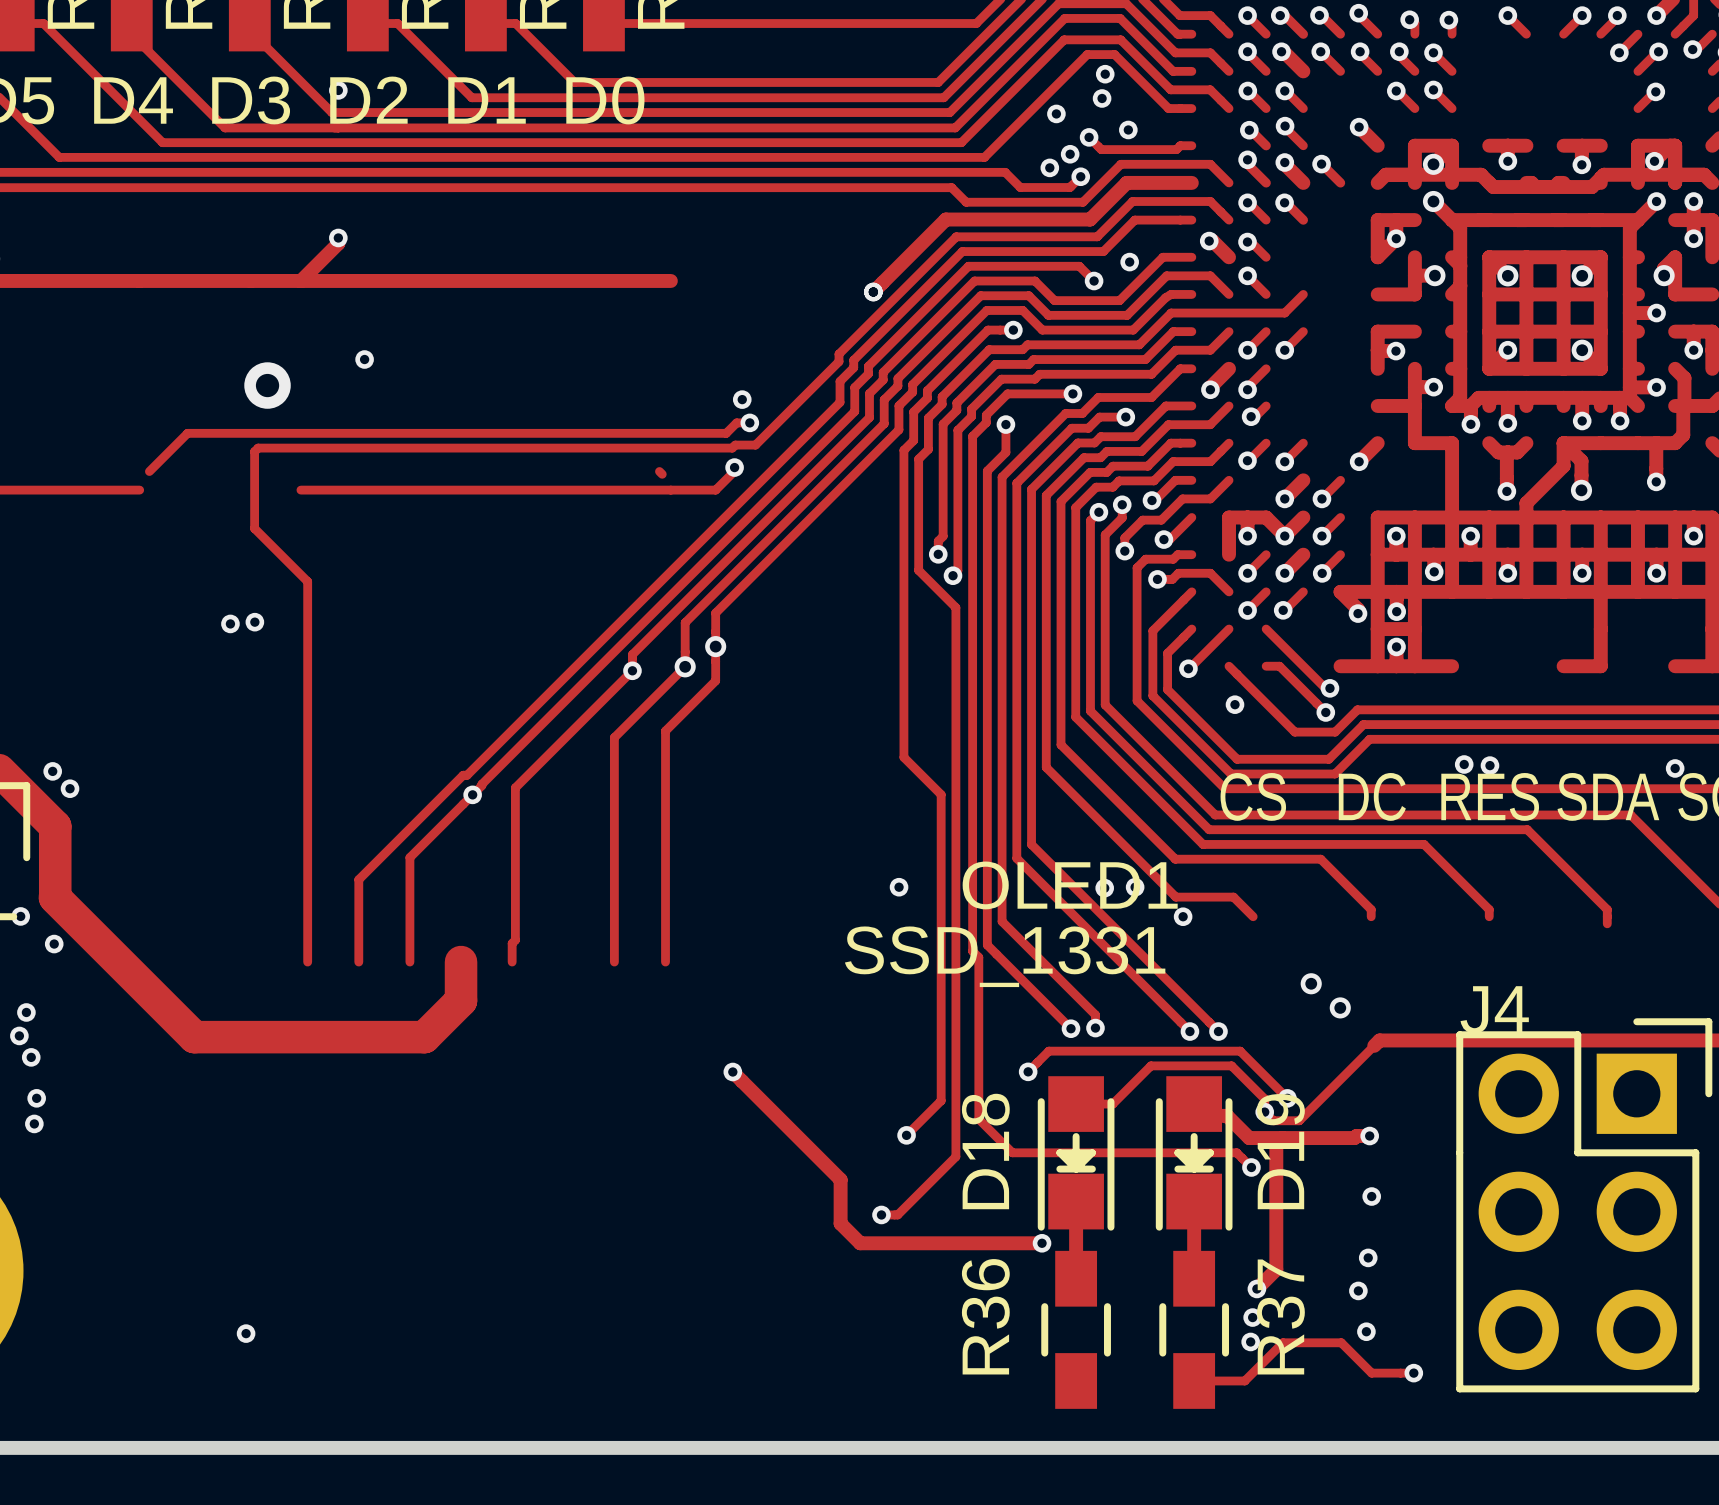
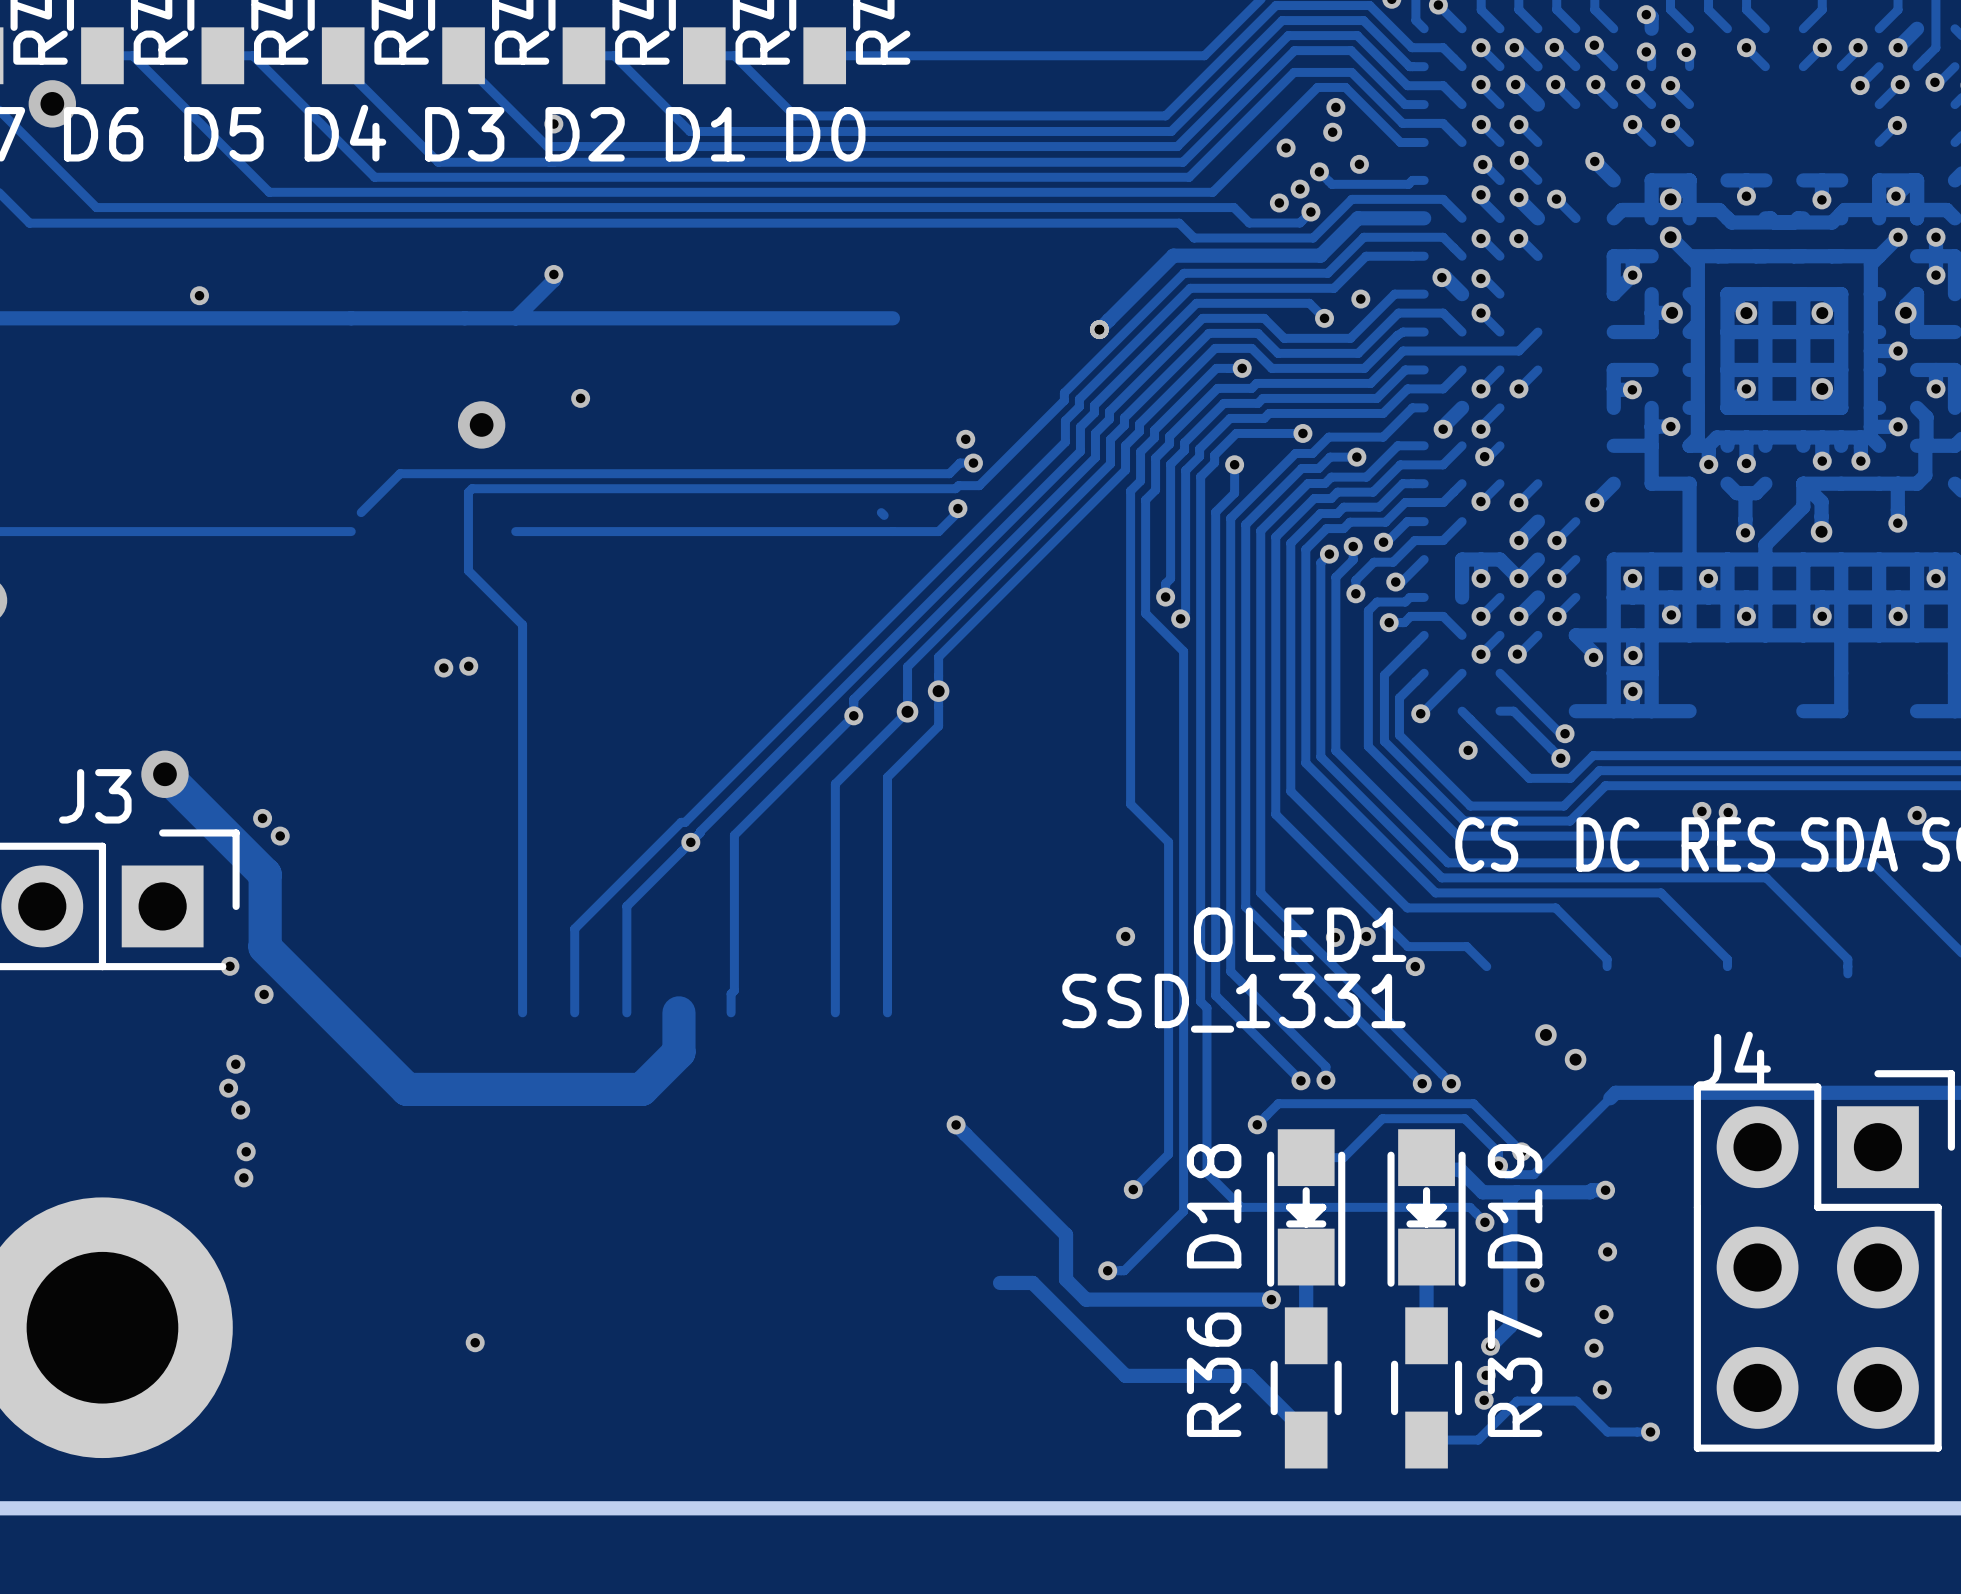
track: none -> (1000, 1282) (1032, 1282) (1125, 1375) (1249, 1375) (1306, 1432) (1306, 1440)
via: none -> (1534, 1282)
via position: (246, 1333) -> (475, 1342)

